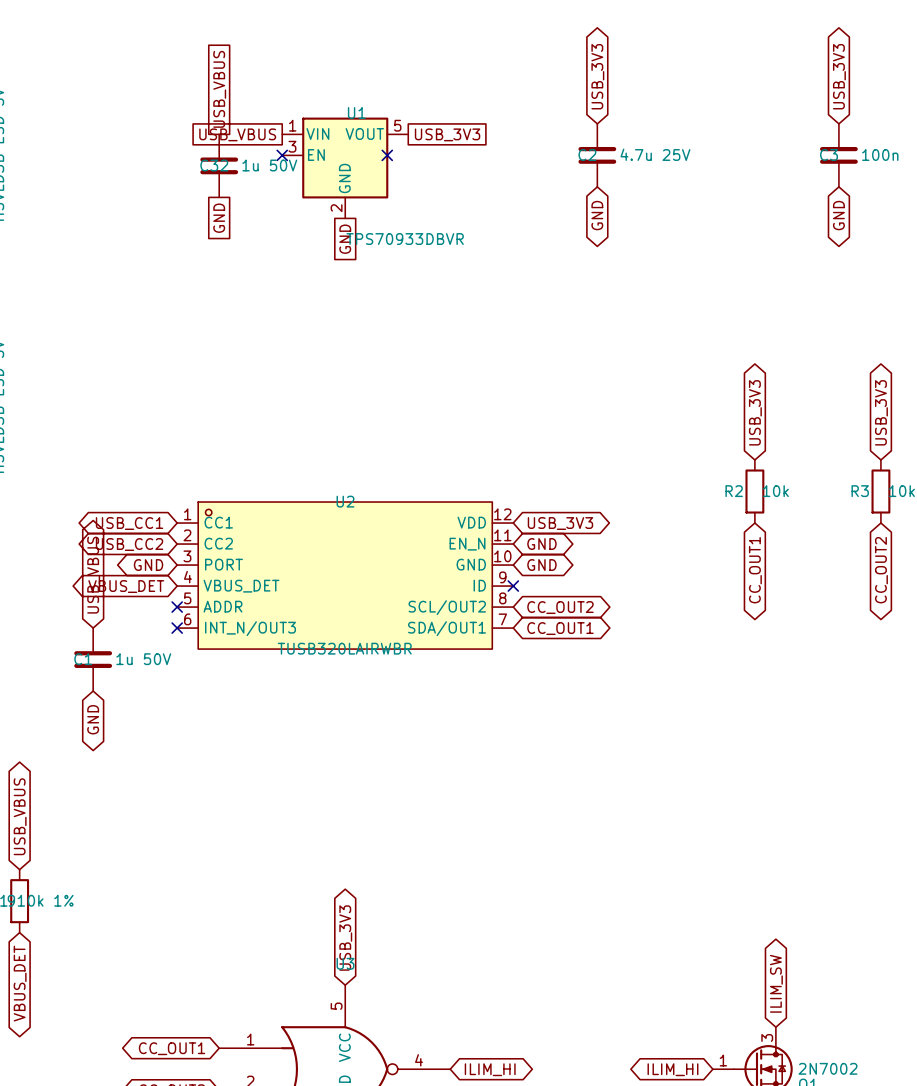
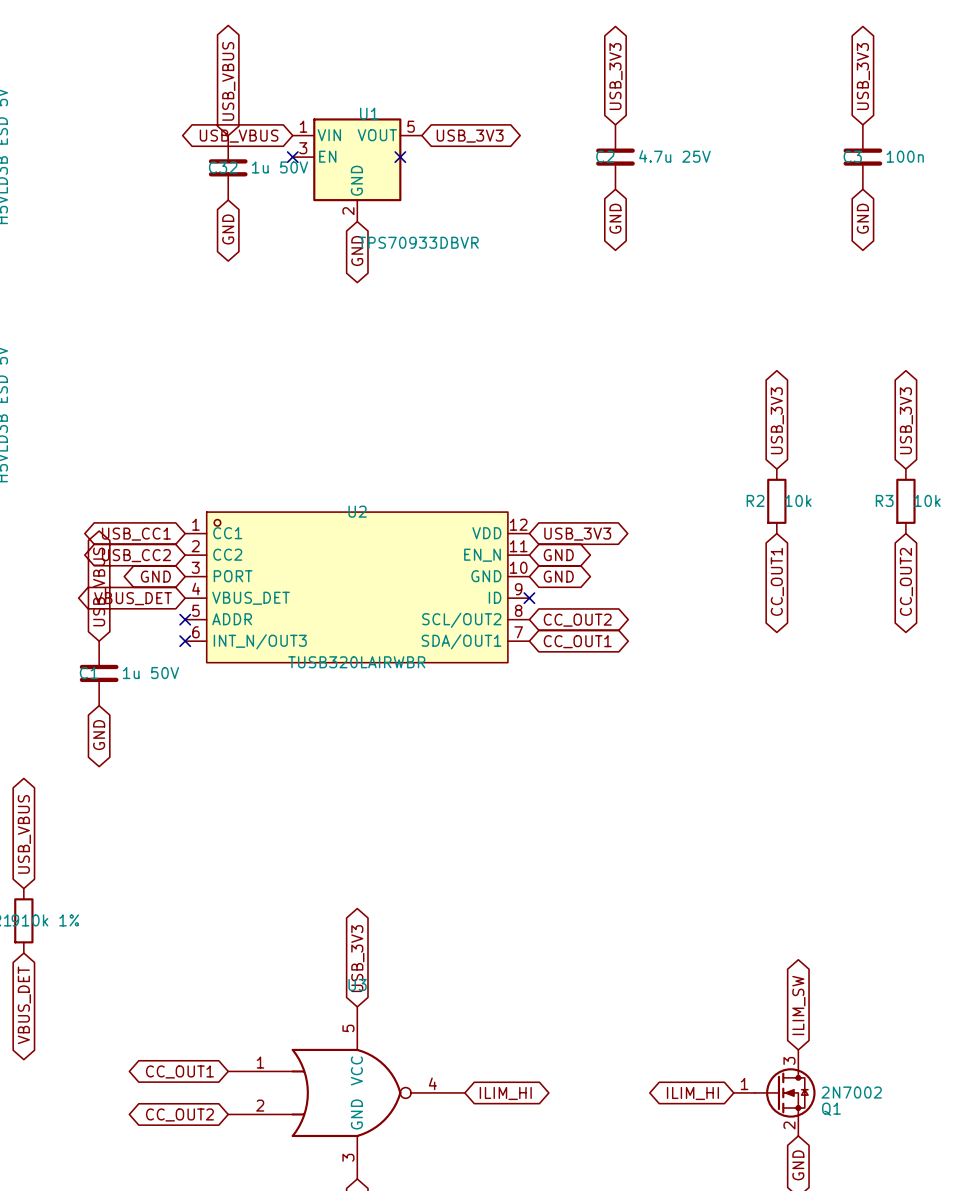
global label shape: passive (219, 89) -> bidirectional (228, 81)
global label shape: passive (237, 134) -> bidirectional (239, 136)
global label shape: passive (447, 134) -> bidirectional (470, 136)
global label shape: passive (219, 218) -> bidirectional (228, 229)
global label shape: passive (345, 239) -> bidirectional (357, 250)

